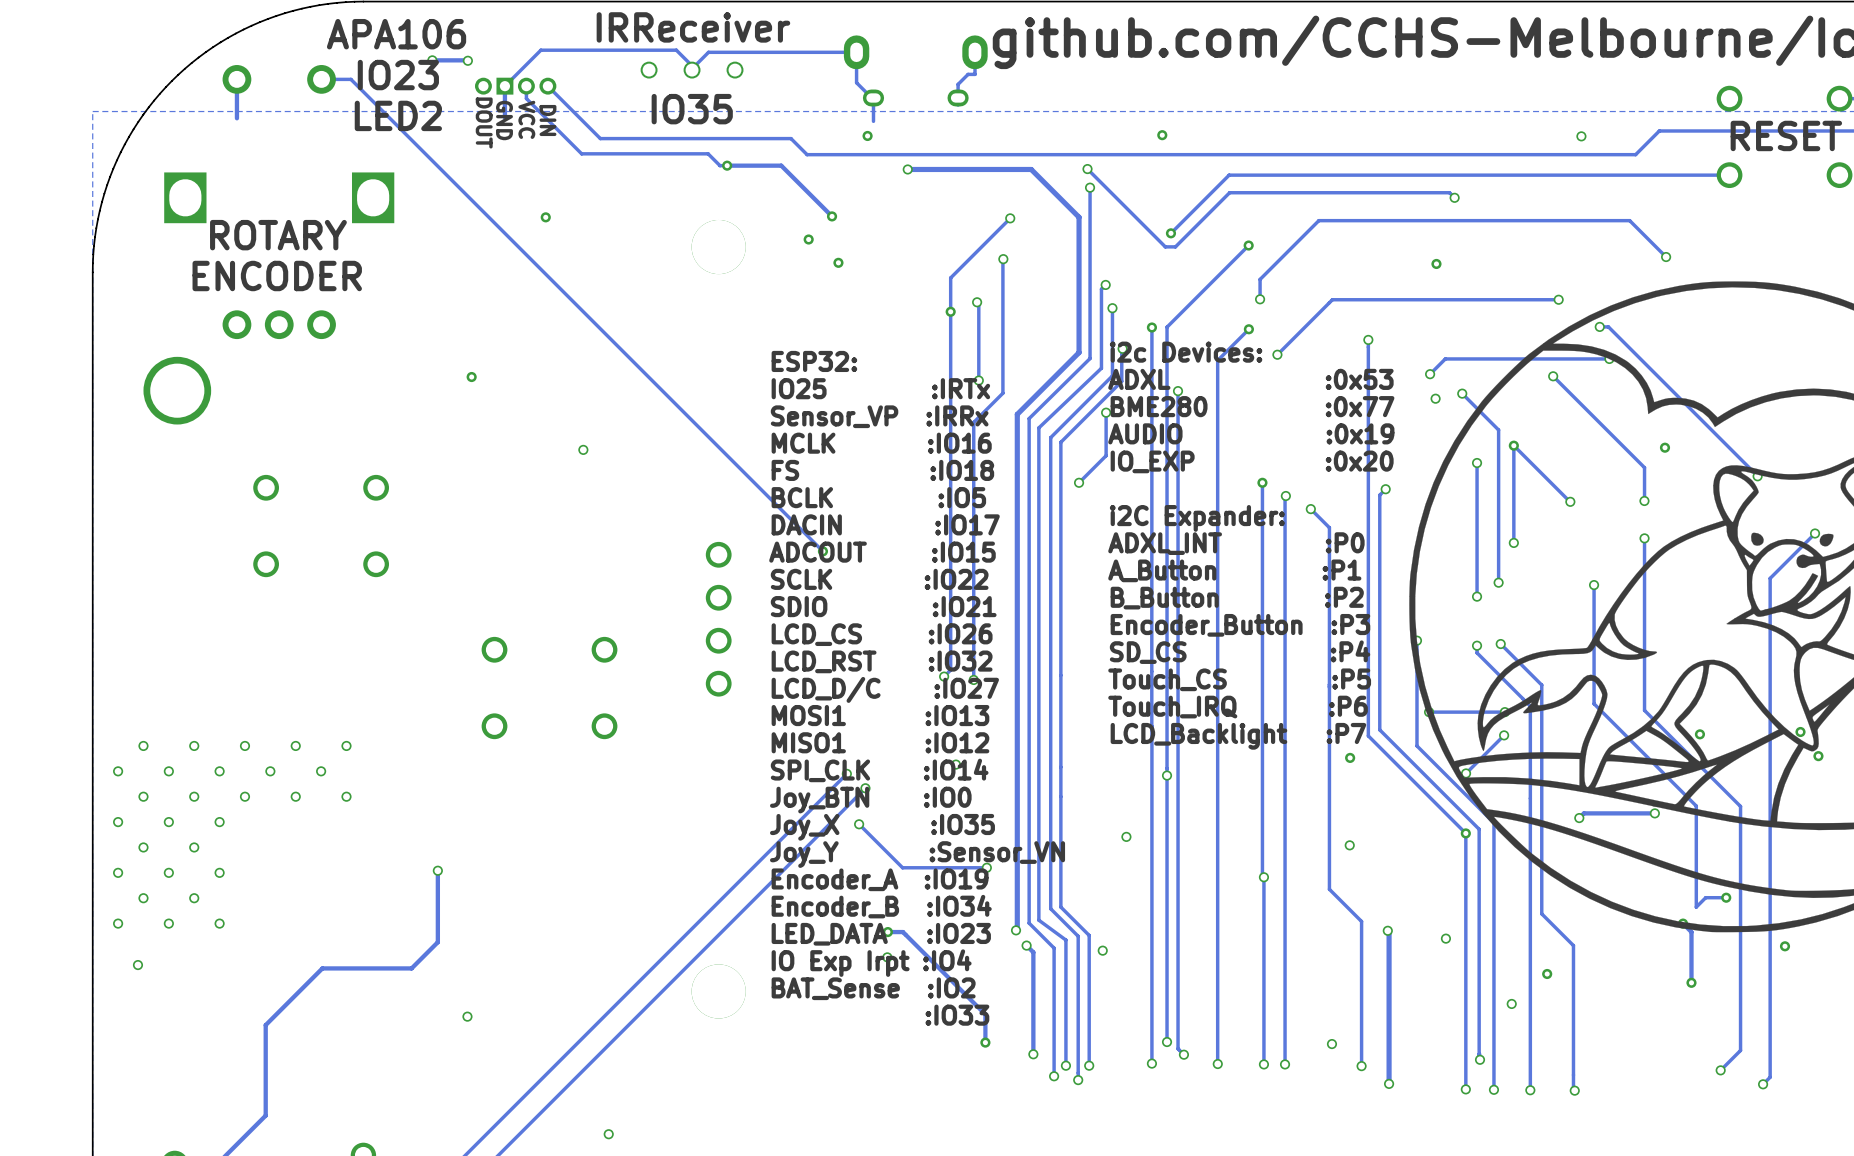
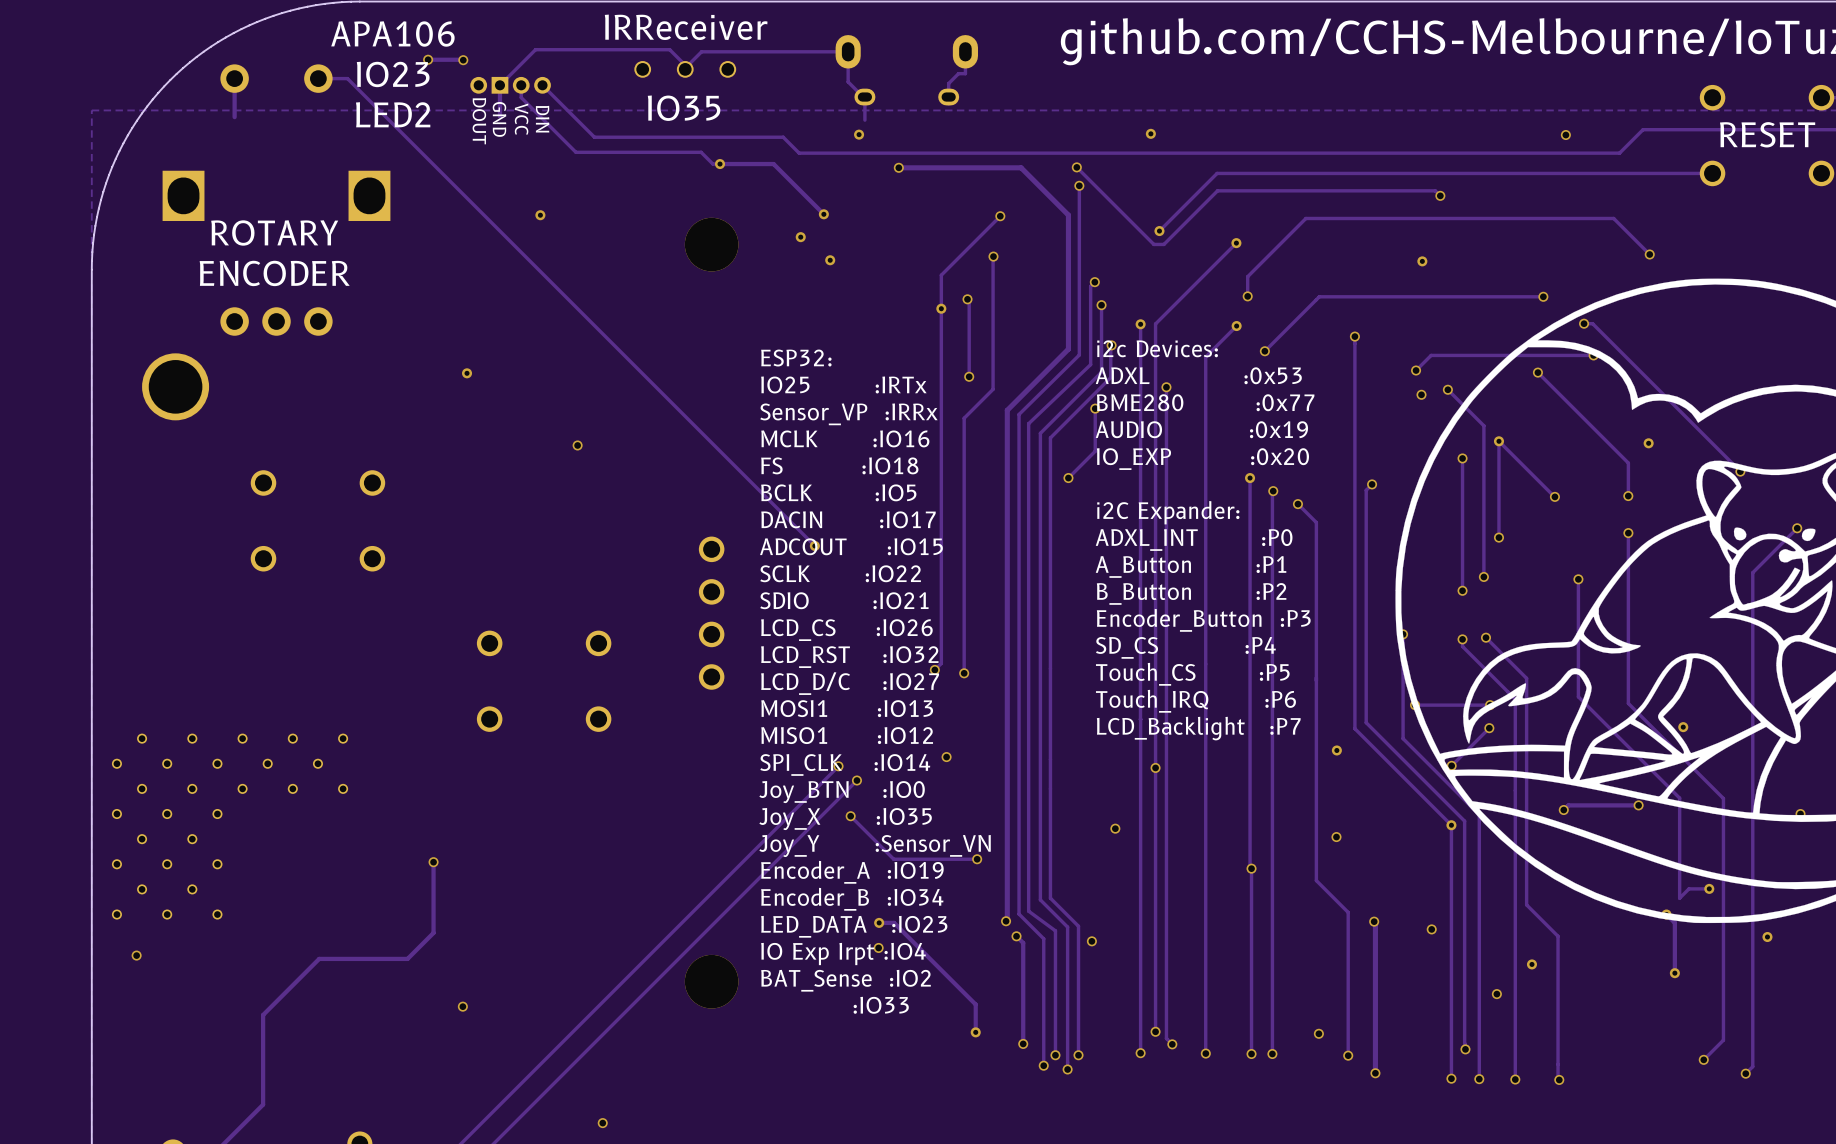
via: (1800, 731) -> none
via: (1818, 756) -> none
via: none -> (1800, 814)

